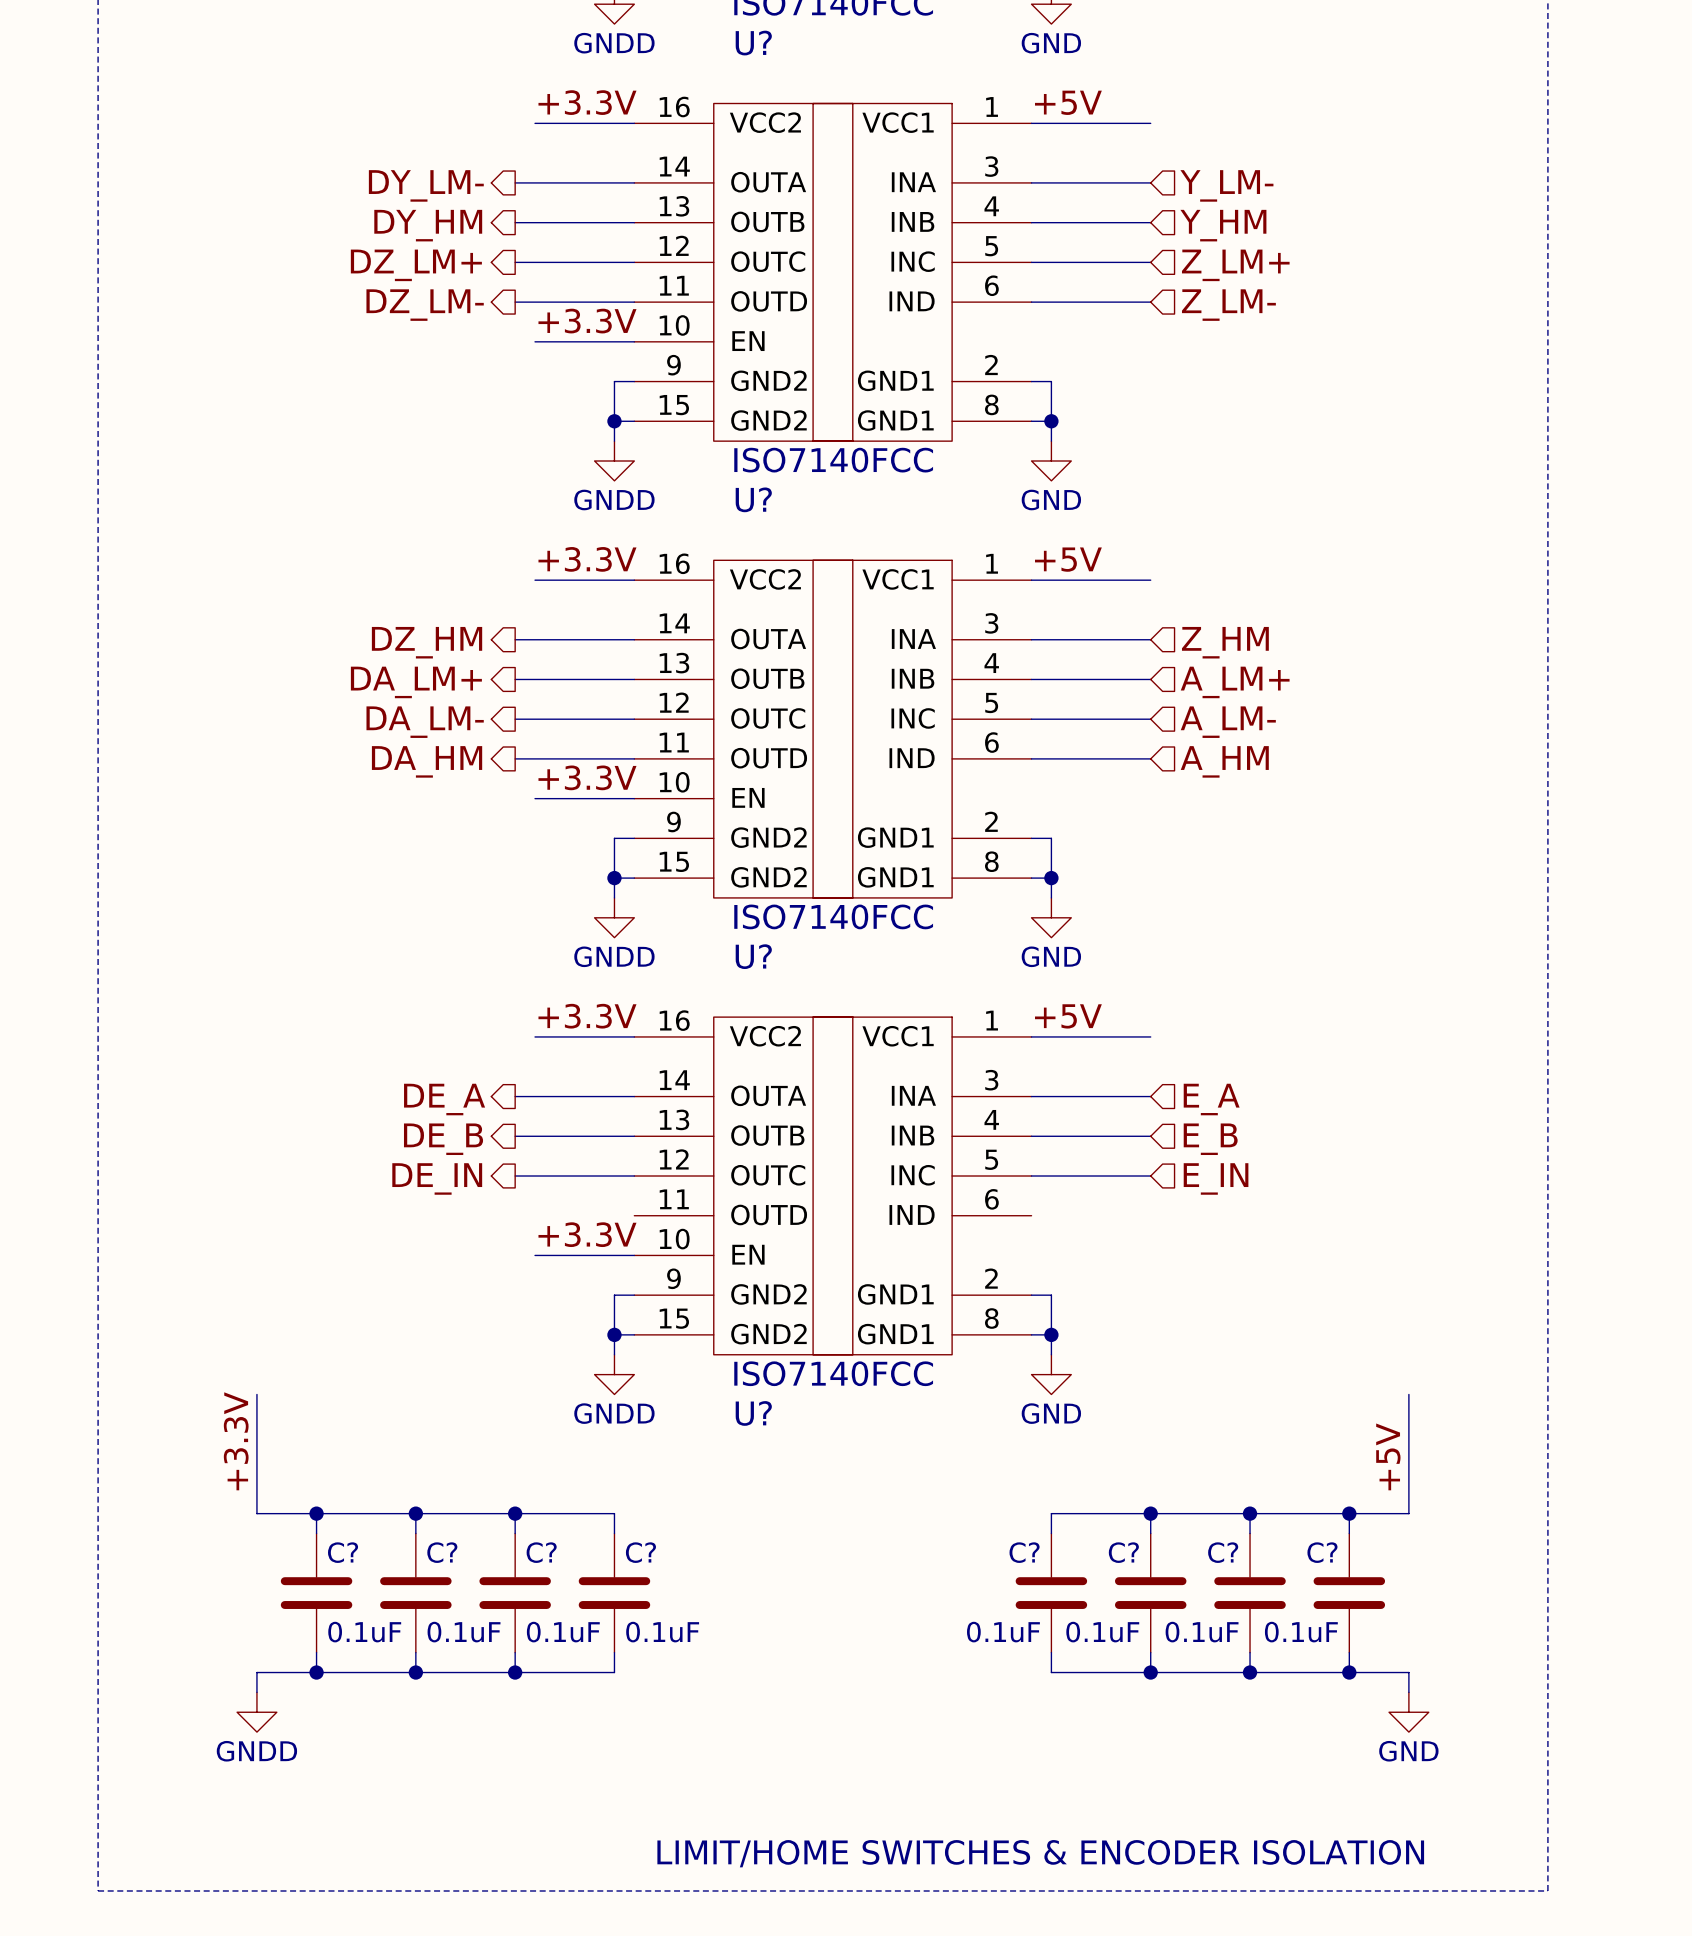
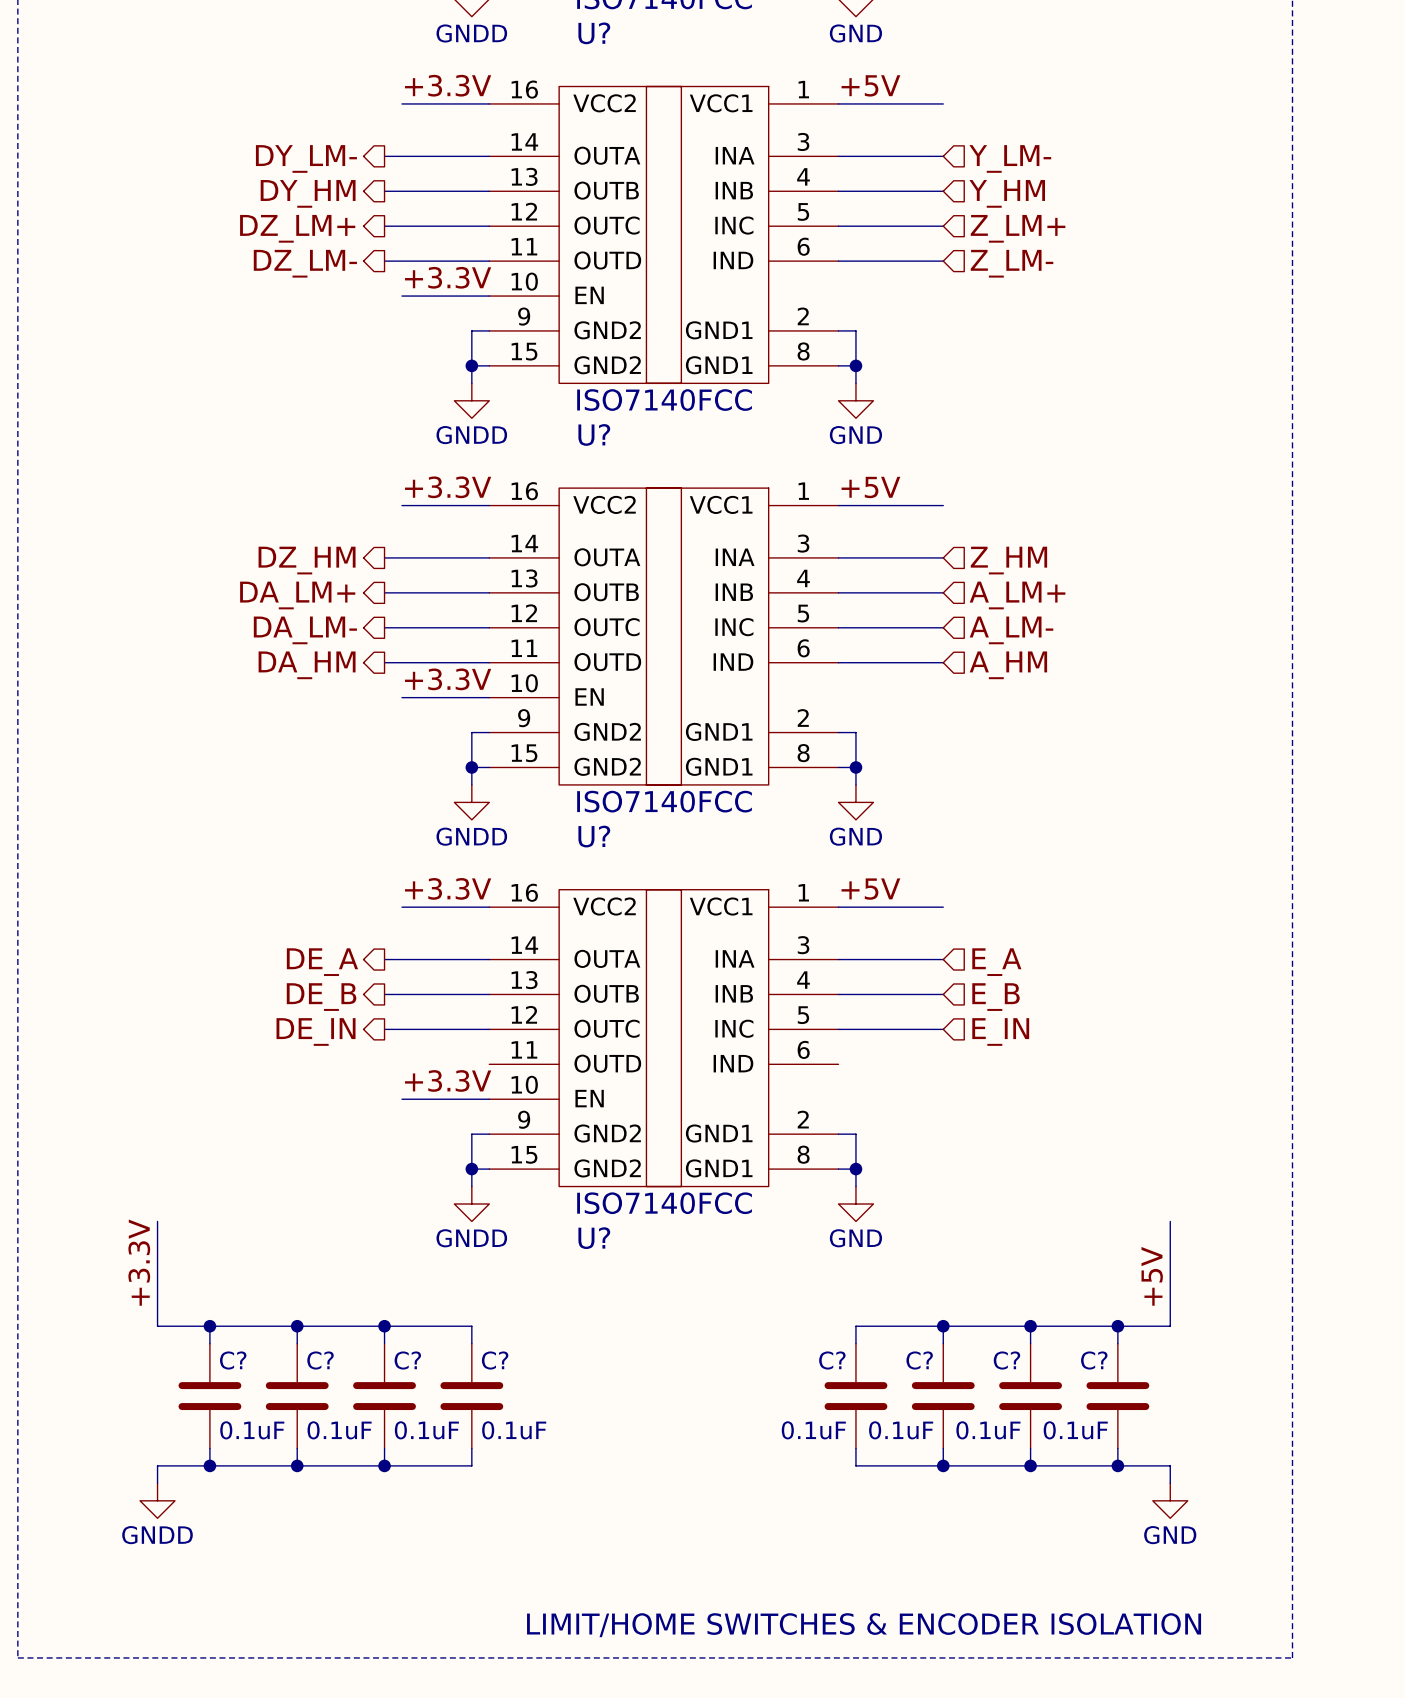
text position: LIMIT/HOME SWITCHES & ENCODER ISOLATION (1040, 1853) -> LIMIT/HOME SWITCHES & ENCODER ISOLATION (864, 1625)

